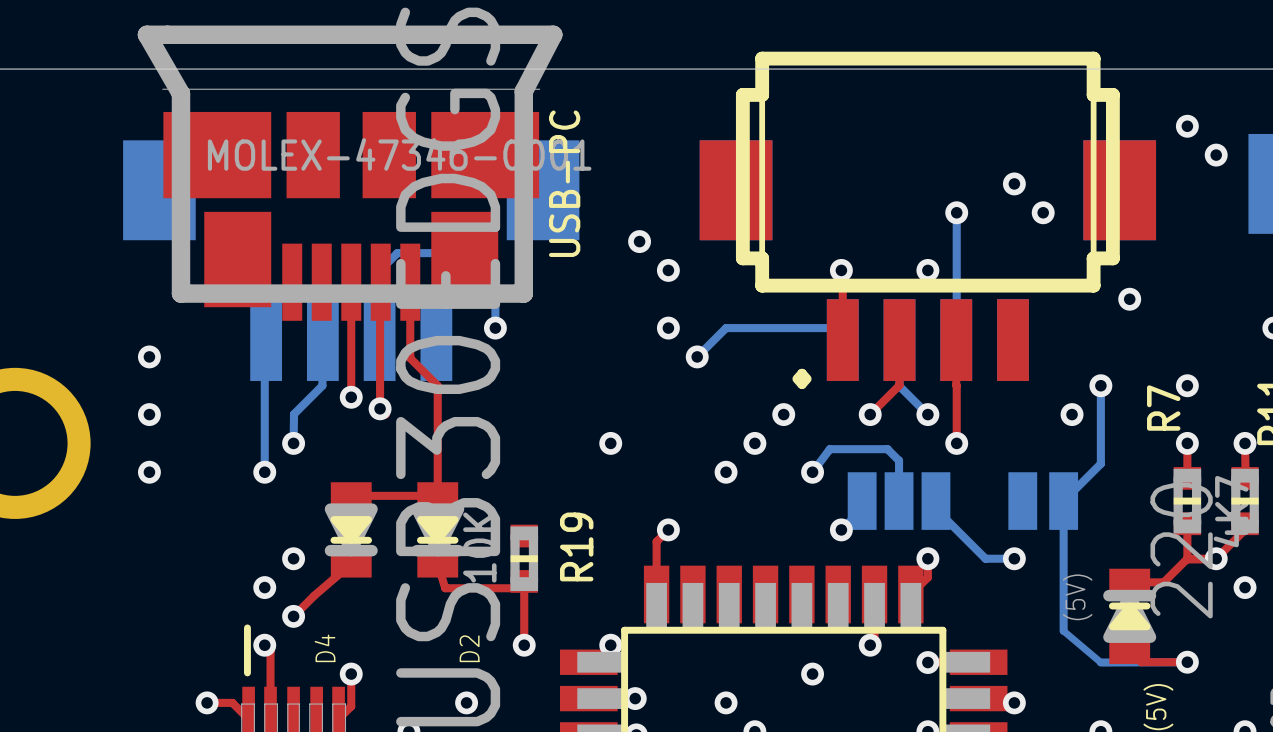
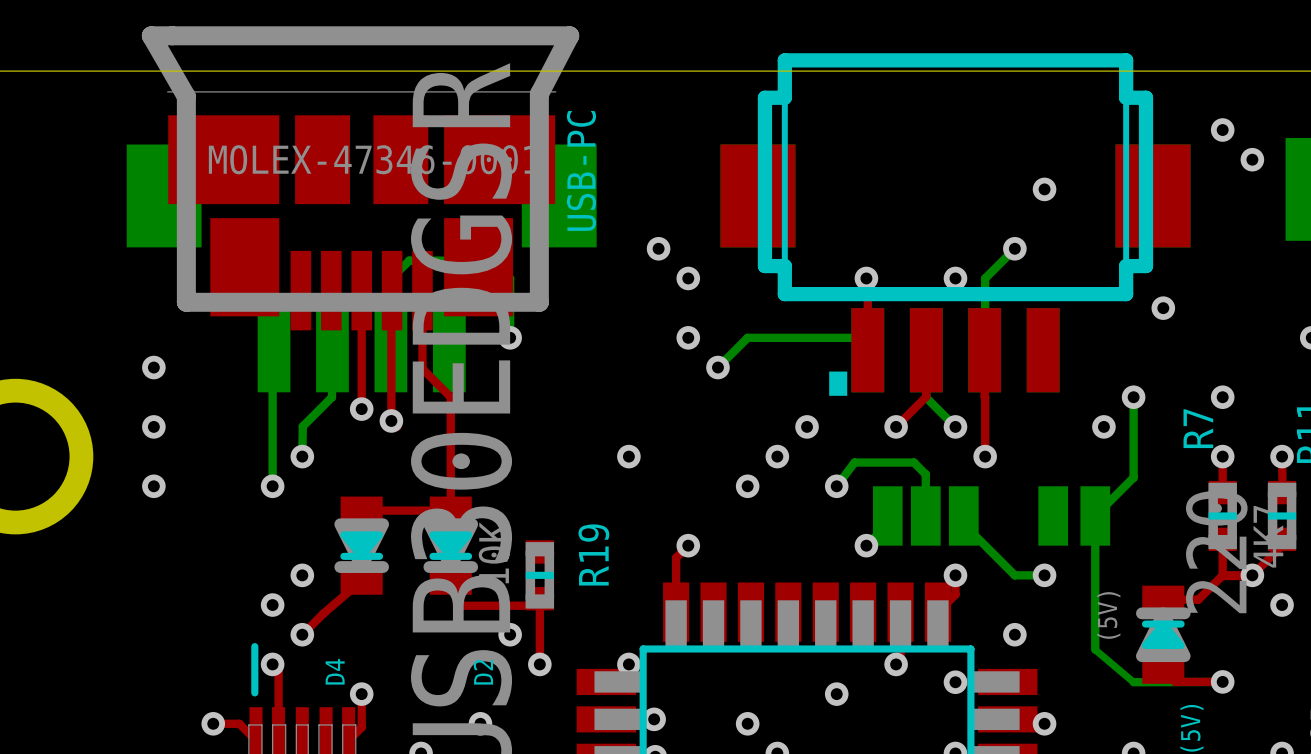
bottom track: (956, 212) (956, 270) -> (1014, 248) (985, 278)
via: (956, 212) -> none
via: (1043, 212) -> none
via: none -> (1014, 248)
via: none -> (510, 634)
via: none -> (1014, 634)

